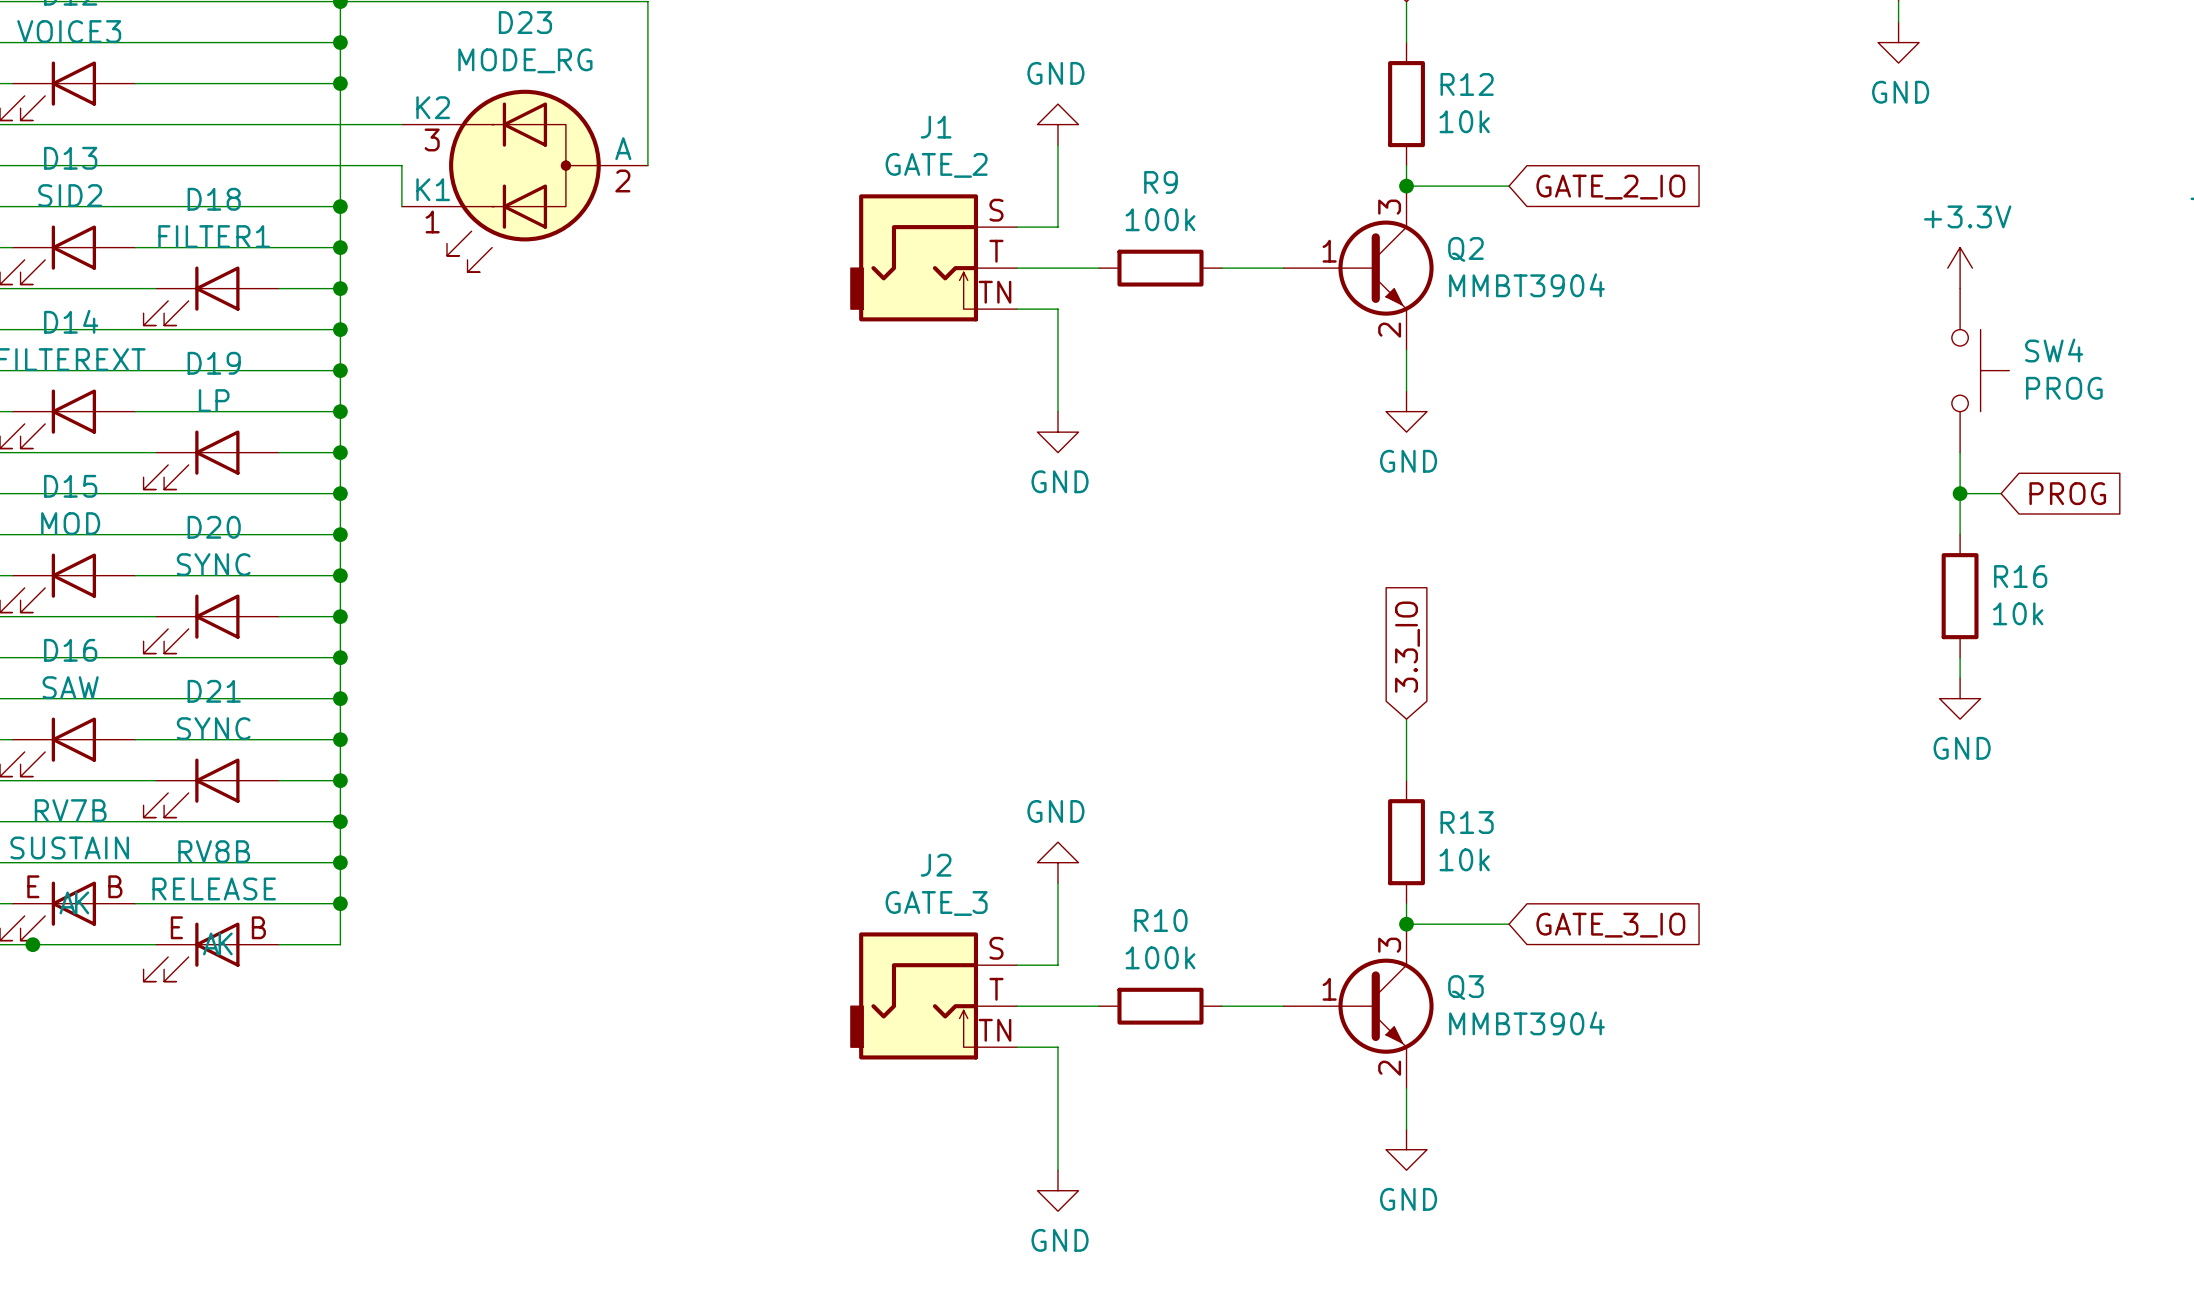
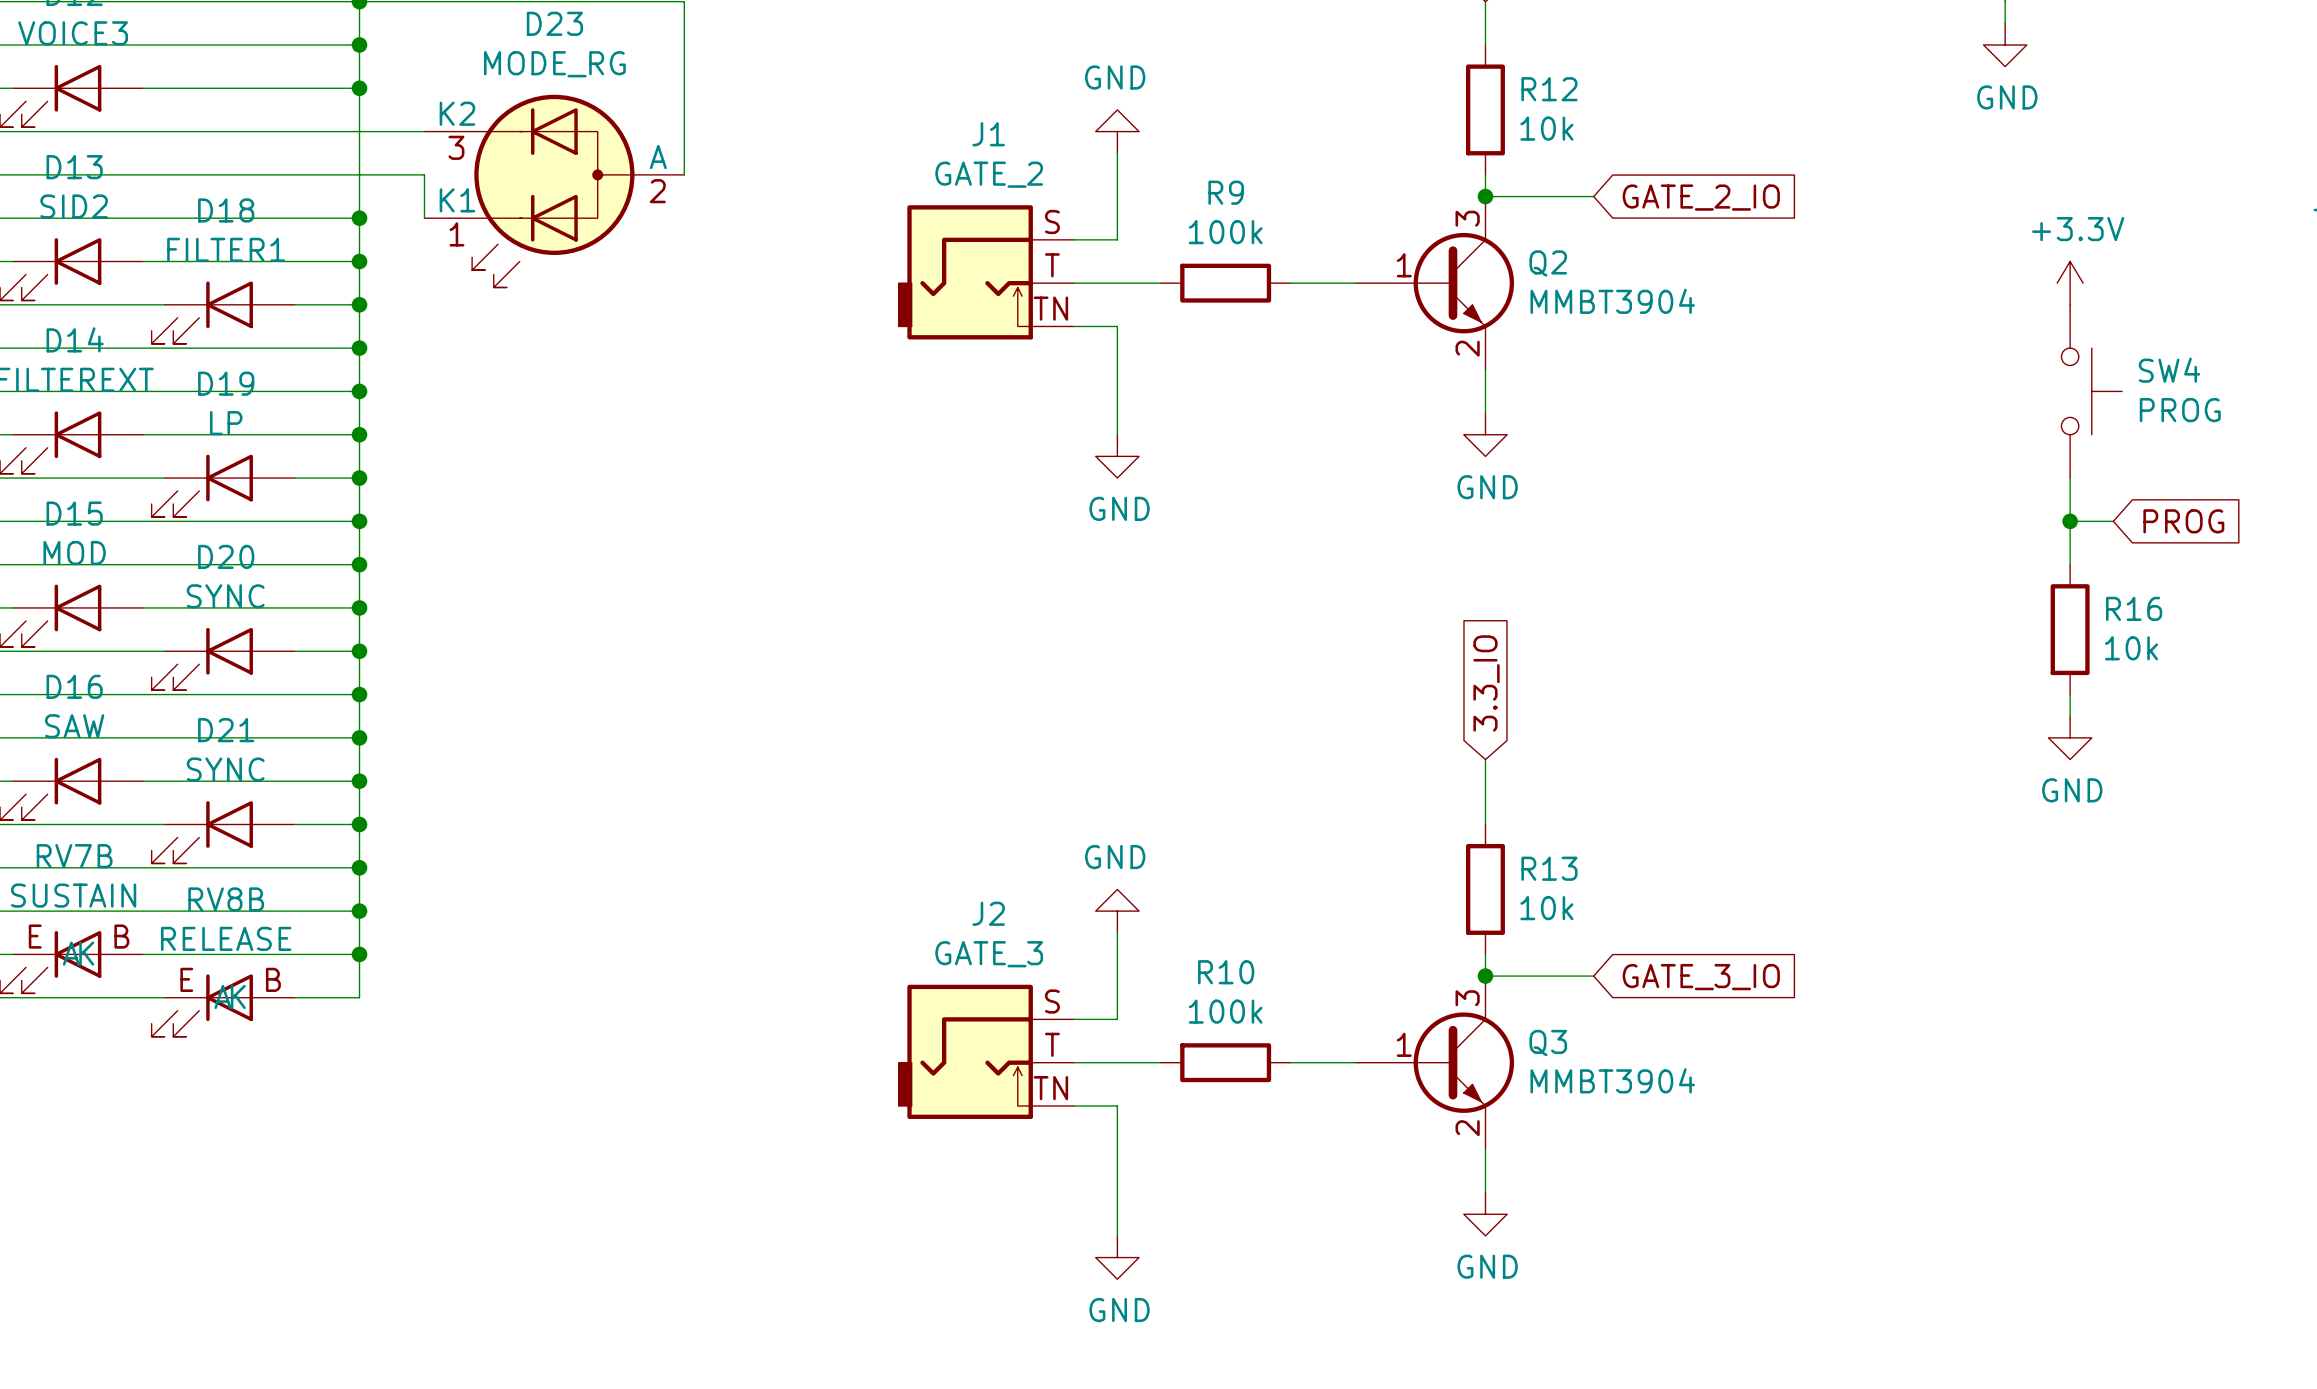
junction: (32, 944) -> none

